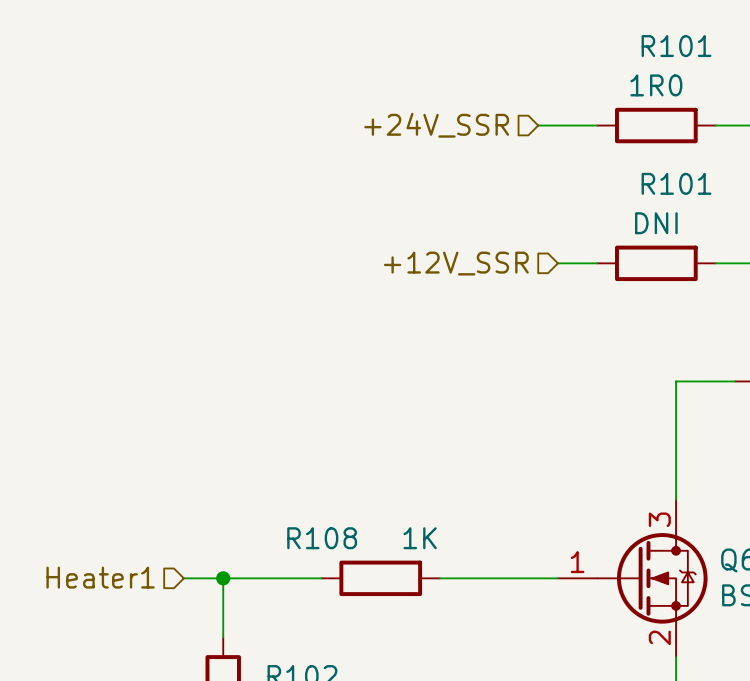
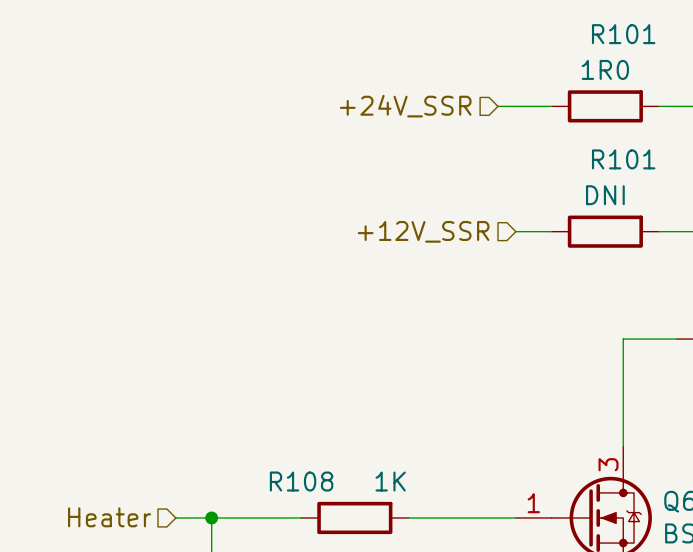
hierarchical label: Heater1 (100, 577) -> Heater (109, 517)

